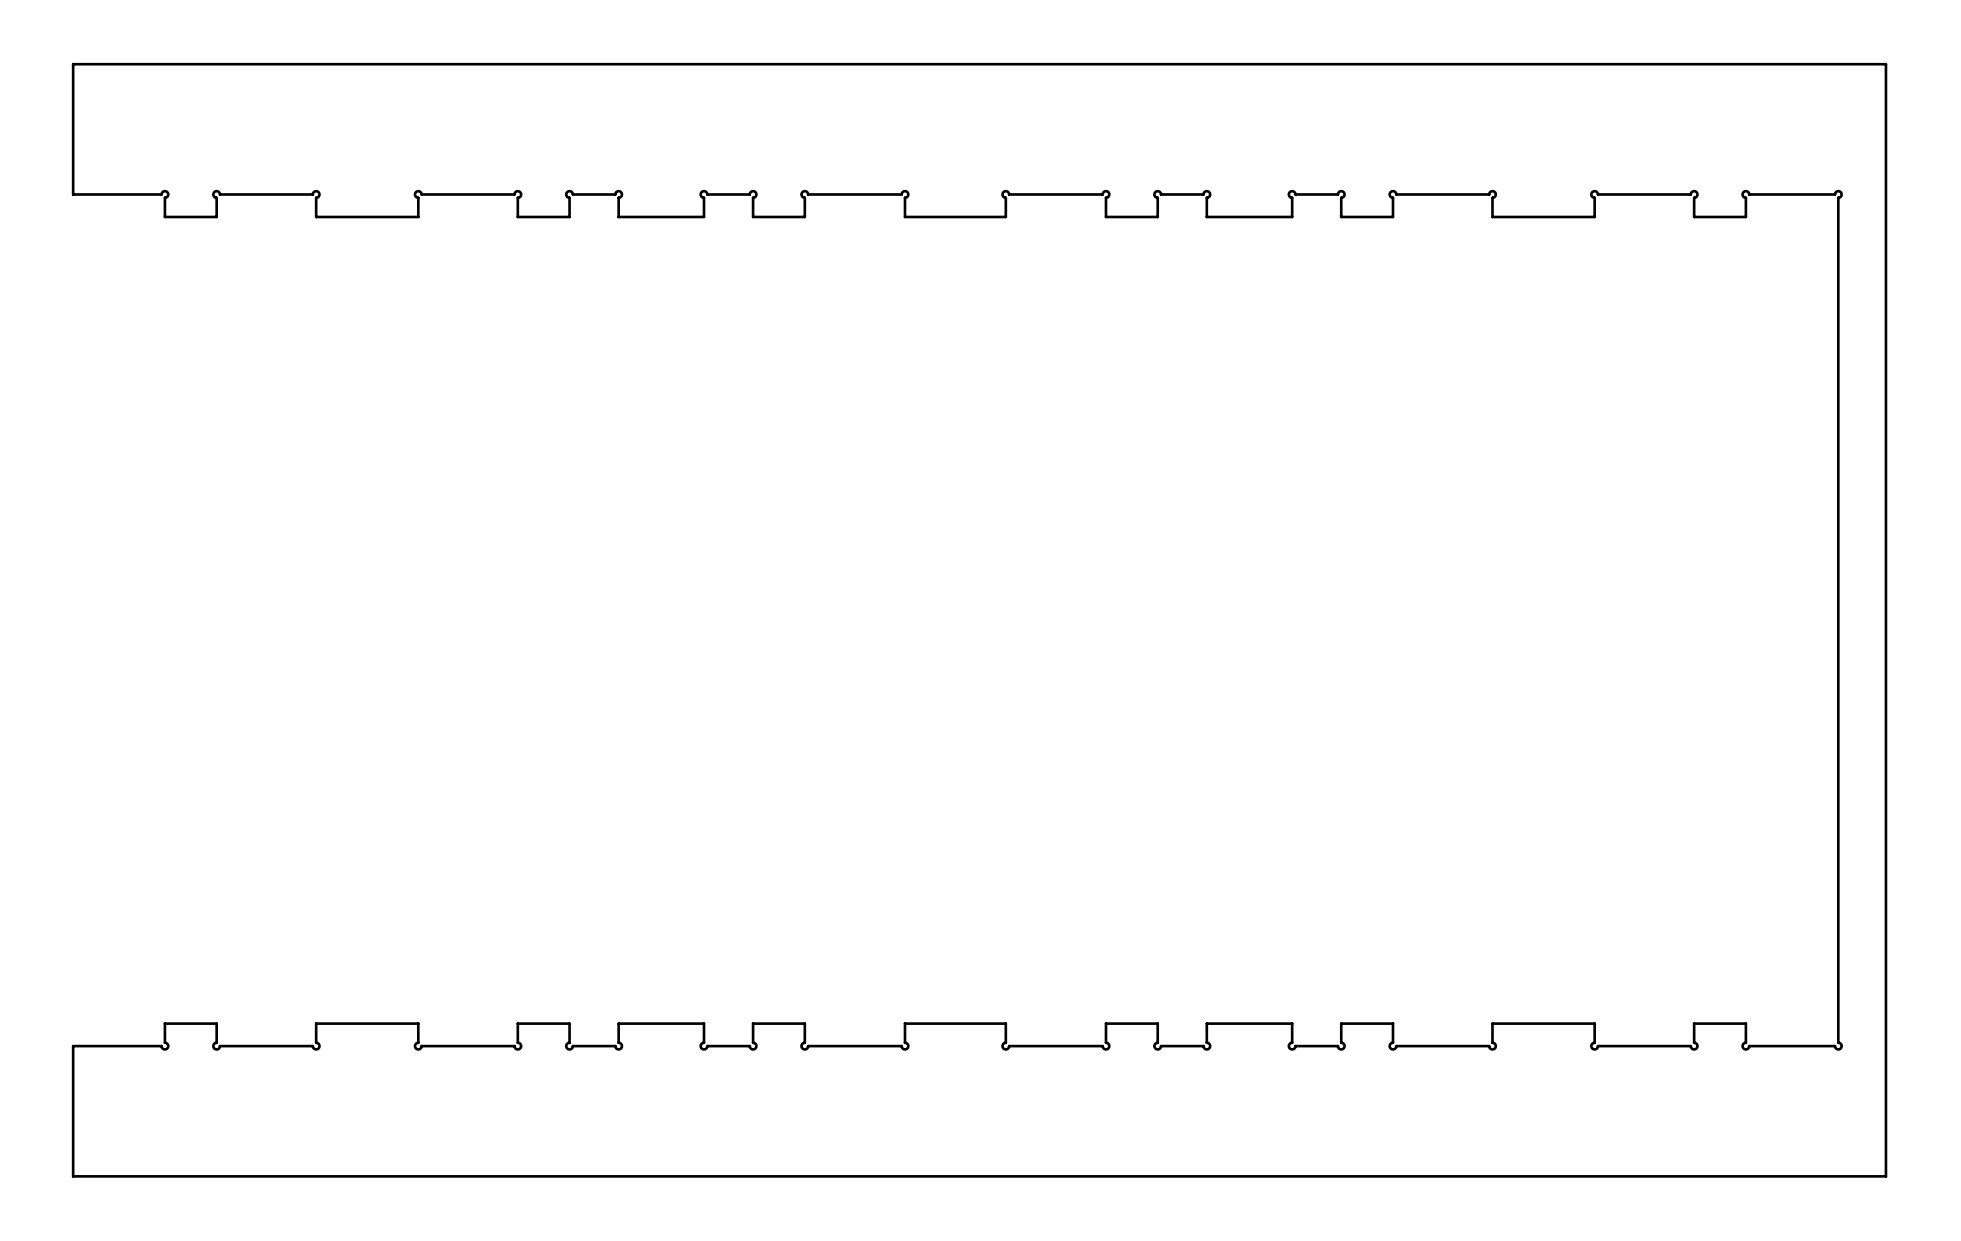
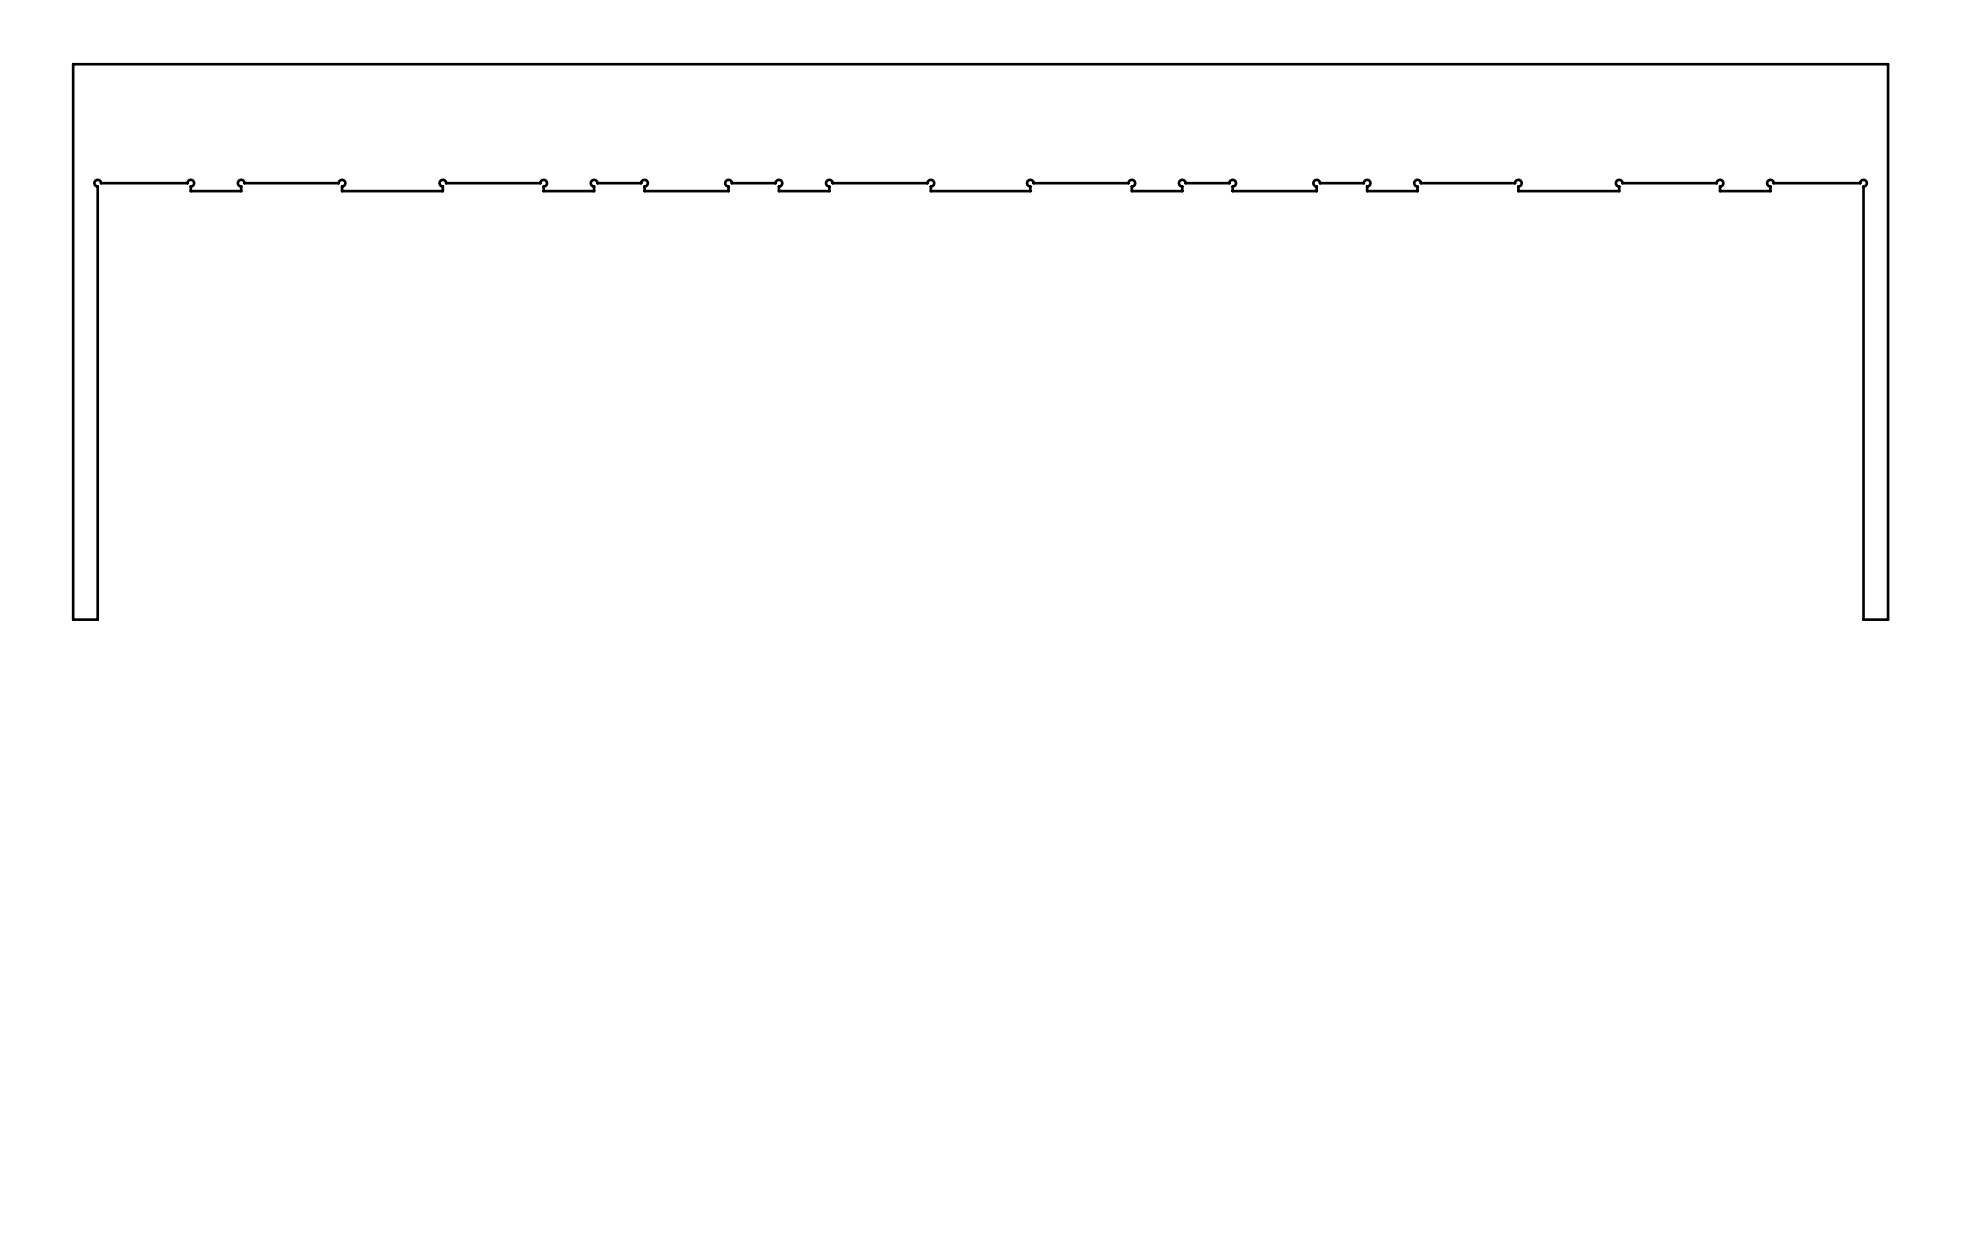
board edge: (1885, 64) (1885, 1176) (73, 1176) (73, 1046) (161, 1046) (165, 1049) (168, 1045) (164, 1042) (164, 1023) (216, 1023) (216, 1042) (213, 1046) (216, 1049) (219, 1046) (312, 1046) (317, 1049) (319, 1045) (316, 1042) (316, 1023) (418, 1023) (418, 1042) (415, 1046) (418, 1049) (421, 1046) (514, 1046) (518, 1049) (521, 1045) (517, 1042) (517, 1023) (569, 1023) (569, 1042) (566, 1046) (569, 1049) (572, 1046) (615, 1046) (617, 1049) (620, 1048) (621, 1045) (618, 1042) (618, 1023) (703, 1023) (703, 1042) (700, 1046) (703, 1049) (707, 1046) (749, 1046) (751, 1049) (754, 1048) (756, 1045) (753, 1042) (753, 1023) (804, 1023) (804, 1042) (801, 1046) (804, 1049) (808, 1046) (901, 1046) (905, 1049) (908, 1045) (904, 1042) (904, 1023) (1005, 1023) (1005, 1042) (1002, 1046) (1005, 1049) (1009, 1046) (1102, 1046) (1106, 1049) (1109, 1045) (1105, 1042) (1105, 1023) (1157, 1023) (1157, 1042) (1154, 1046) (1157, 1049) (1161, 1046) (1203, 1046) (1205, 1048) (1208, 1048) (1210, 1045) (1206, 1042) (1206, 1023) (1292, 1023) (1292, 1042) (1288, 1046) (1292, 1049) (1295, 1046) (1337, 1046) (1339, 1049) (1342, 1048) (1344, 1045) (1341, 1042) (1341, 1023) (1392, 1023) (1392, 1042) (1389, 1046) (1392, 1049) (1396, 1046) (1489, 1046) (1493, 1049) (1495, 1045) (1492, 1042) (1492, 1023) (1594, 1023) (1594, 1042) (1591, 1046) (1594, 1049) (1597, 1046) (1690, 1046) (1694, 1049) (1697, 1045) (1694, 1042) (1694, 1023) (1745, 1023) (1745, 1042) (1742, 1045) (1744, 1049) (1749, 1046) (1835, 1046) (1836, 1049) (1840, 1048) (1841, 1045) (1838, 1042) (1838, 197) (1841, 194) (1838, 191) (1835, 194) (1749, 194) (1744, 191) (1742, 194) (1745, 197) (1745, 216) (1694, 216) (1694, 197) (1697, 194) (1694, 191) (1690, 194) (1597, 194) (1593, 191) (1591, 194) (1594, 197) (1594, 216) (1492, 216) (1492, 197) (1495, 194) (1492, 191) (1489, 194) (1396, 194) (1392, 191) (1389, 194) (1392, 197) (1392, 216) (1341, 216) (1341, 197) (1344, 194) (1341, 191) (1337, 194) (1295, 194) (1293, 191) (1290, 191) (1288, 194) (1292, 197) (1292, 216) (1206, 216) (1206, 197) (1210, 194) (1206, 191) (1203, 194) (1161, 194) (1159, 191) (1156, 191) (1154, 194) (1157, 197) (1157, 216) (1105, 216) (1105, 197) (1109, 194) (1106, 191) (1102, 194) (1009, 194) (1004, 191) (1002, 194) (1005, 197) (1005, 216) (904, 216) (904, 197) (908, 194) (905, 191) (901, 194) (808, 194) (803, 191) (801, 194) (804, 197) (804, 216) (753, 216) (753, 197) (756, 194) (753, 191) (749, 194) (707, 194) (705, 191) (702, 191) (700, 194) (703, 197) (703, 216) (618, 216) (618, 197) (621, 194) (618, 191) (615, 194) (572, 194) (571, 191) (567, 191) (566, 194) (569, 197) (569, 216) (517, 216) (517, 197) (521, 194) (517, 191) (514, 194) (421, 194) (417, 191) (415, 194) (418, 197) (418, 216) (316, 216) (316, 197) (319, 194) (316, 191) (312, 194) (219, 194) (215, 191) (213, 194) (216, 197) (216, 216) (164, 216) (164, 197) (168, 194) (165, 191) (161, 194) (73, 194) -> (1885, 64) (1888, 64) (1888, 619) (1863, 619) (1863, 186) (1866, 183) (1864, 180) (1860, 183) (1773, 183) (1769, 179) (1767, 183) (1770, 186) (1770, 191) (1720, 191) (1720, 186) (1723, 183) (1720, 179) (1716, 183) (1622, 183) (1618, 179) (1615, 183) (1619, 186) (1619, 191) (1518, 191) (1518, 186) (1521, 183) (1518, 179) (1515, 183) (1420, 183) (1416, 179) (1414, 183) (1417, 186) (1417, 191) (1367, 191) (1367, 186) (1370, 183) (1367, 179) (1363, 183) (1320, 183) (1316, 179) (1313, 183) (1316, 186) (1316, 191) (1232, 191) (1232, 186) (1235, 183) (1232, 179) (1229, 183) (1185, 183) (1181, 179) (1178, 183) (1182, 186) (1182, 191) (1131, 191) (1131, 186) (1135, 183) (1131, 179) (1128, 183) (1033, 183) (1029, 179) (1027, 183) (1030, 186) (1030, 191) (930, 191) (930, 186) (934, 183) (930, 179) (927, 183) (832, 183) (828, 179) (826, 183) (829, 186) (829, 191) (778, 191) (778, 186) (782, 183) (779, 179) (775, 183) (731, 183) (727, 179) (725, 183) (728, 186) (728, 191) (644, 191) (644, 186) (647, 183) (644, 179) (641, 183) (597, 183) (593, 179) (590, 183) (594, 186) (594, 191) (543, 191) (543, 186) (546, 183) (543, 179) (540, 183) (446, 183) (442, 179) (439, 183) (442, 186) (442, 191) (342, 191) (342, 186) (345, 183) (342, 179) (338, 183) (244, 183) (241, 179) (237, 183) (241, 186) (241, 191) (190, 191) (190, 186) (194, 183) (191, 179) (187, 183) (101, 183) (96, 180) (94, 183) (97, 186) (97, 619) (73, 619) (73, 194)

